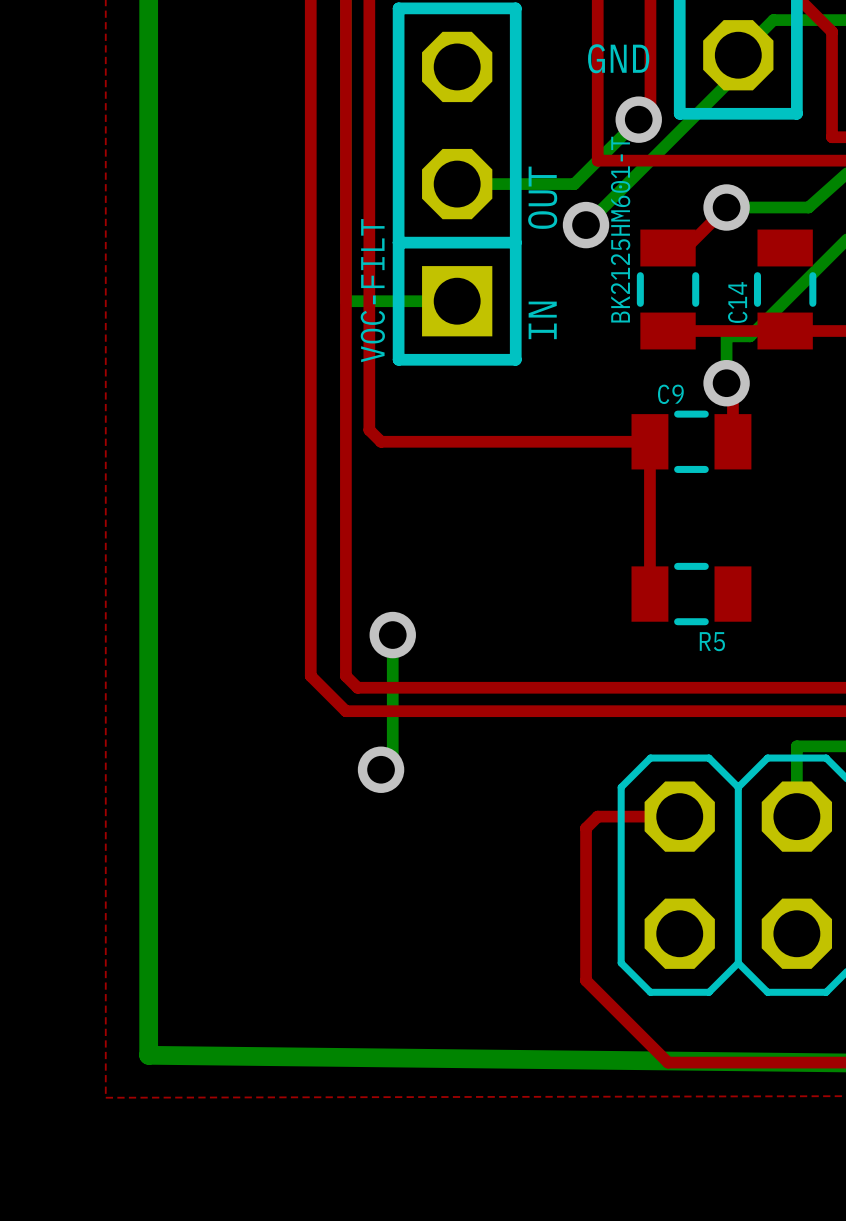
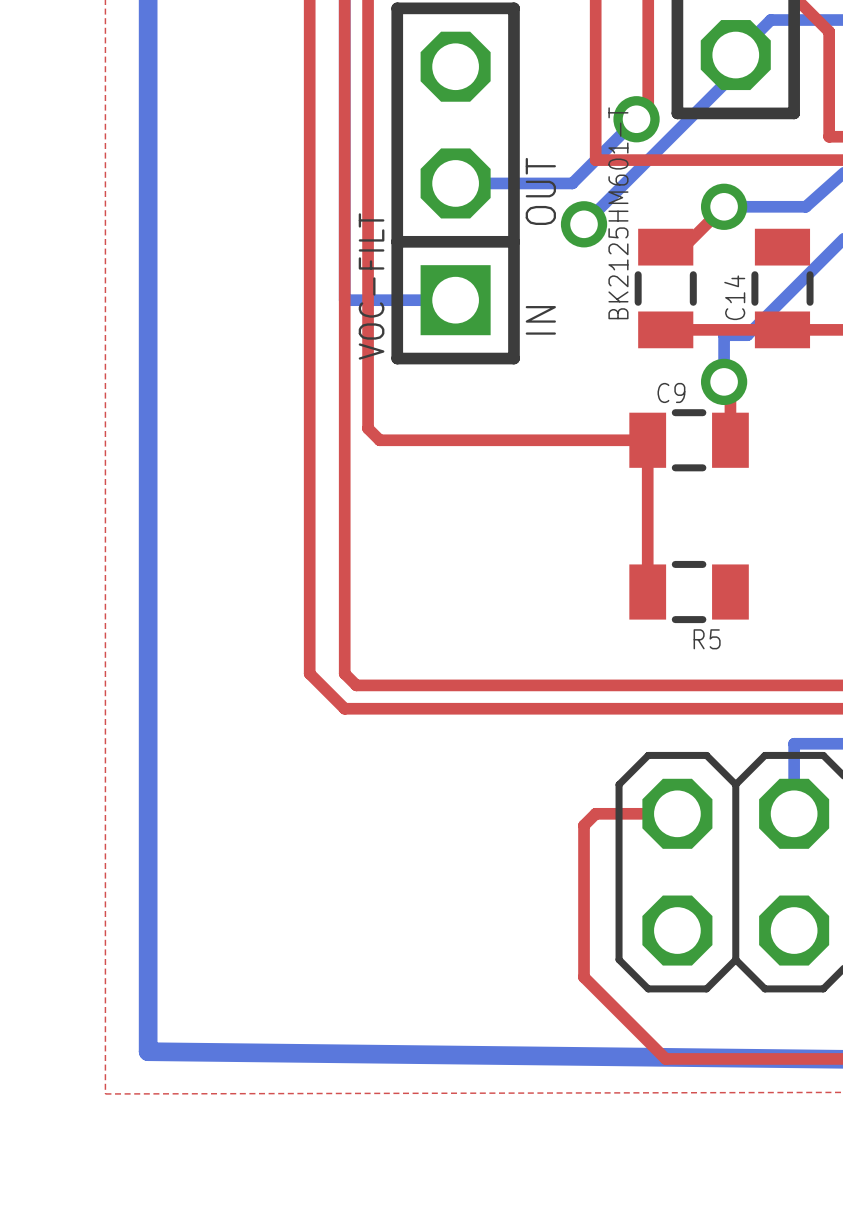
text: GND (618, 58) -> none
bottom track: (392, 635) (392, 758) (381, 769) -> none
via: (392, 635) -> none
via: (381, 769) -> none

